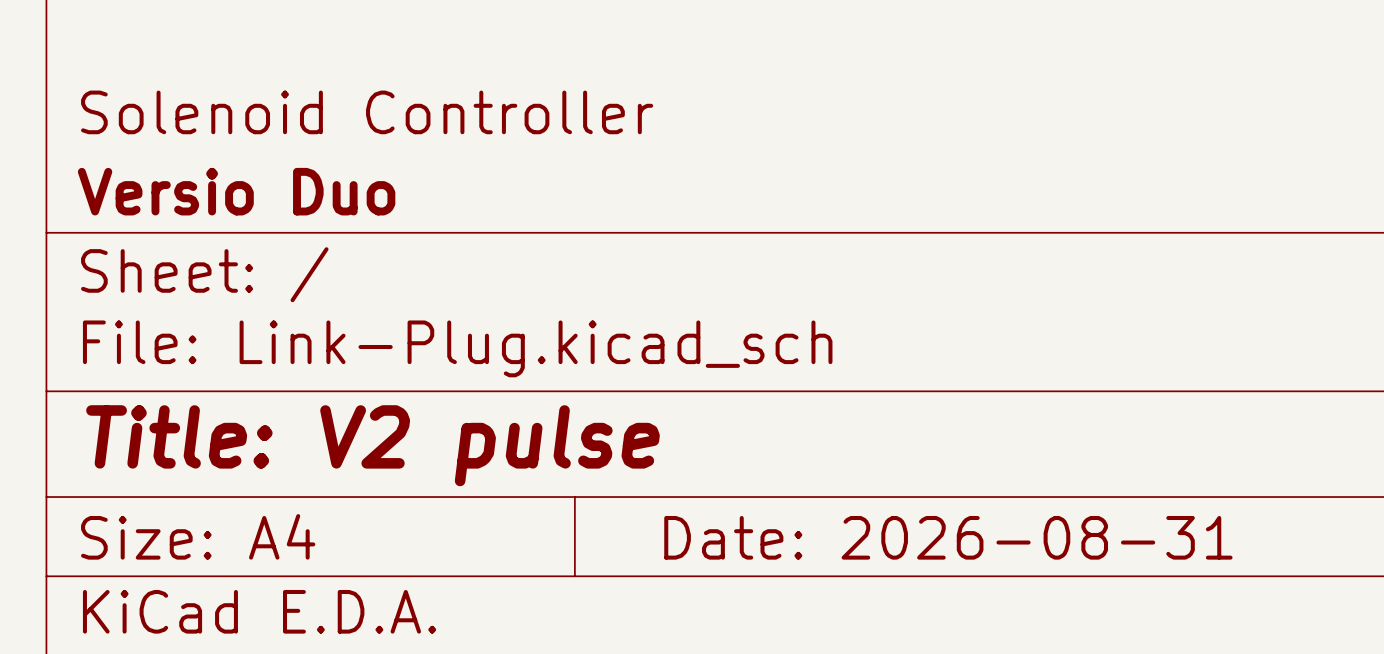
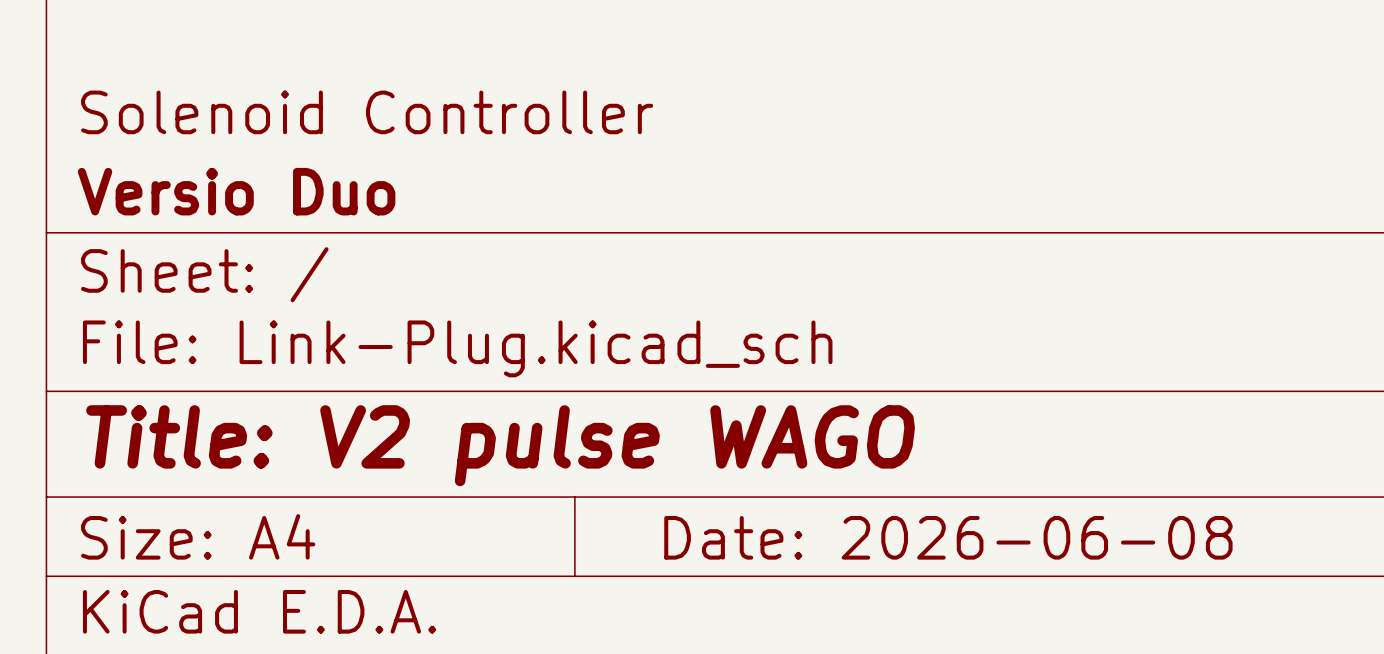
title block: Title: V2 pulse (372, 445) -> Title: V2 pulse WAGO (500, 445)
title block: Date: 2026-08-31 (948, 537) -> Date: 2026-06-08 (948, 537)

